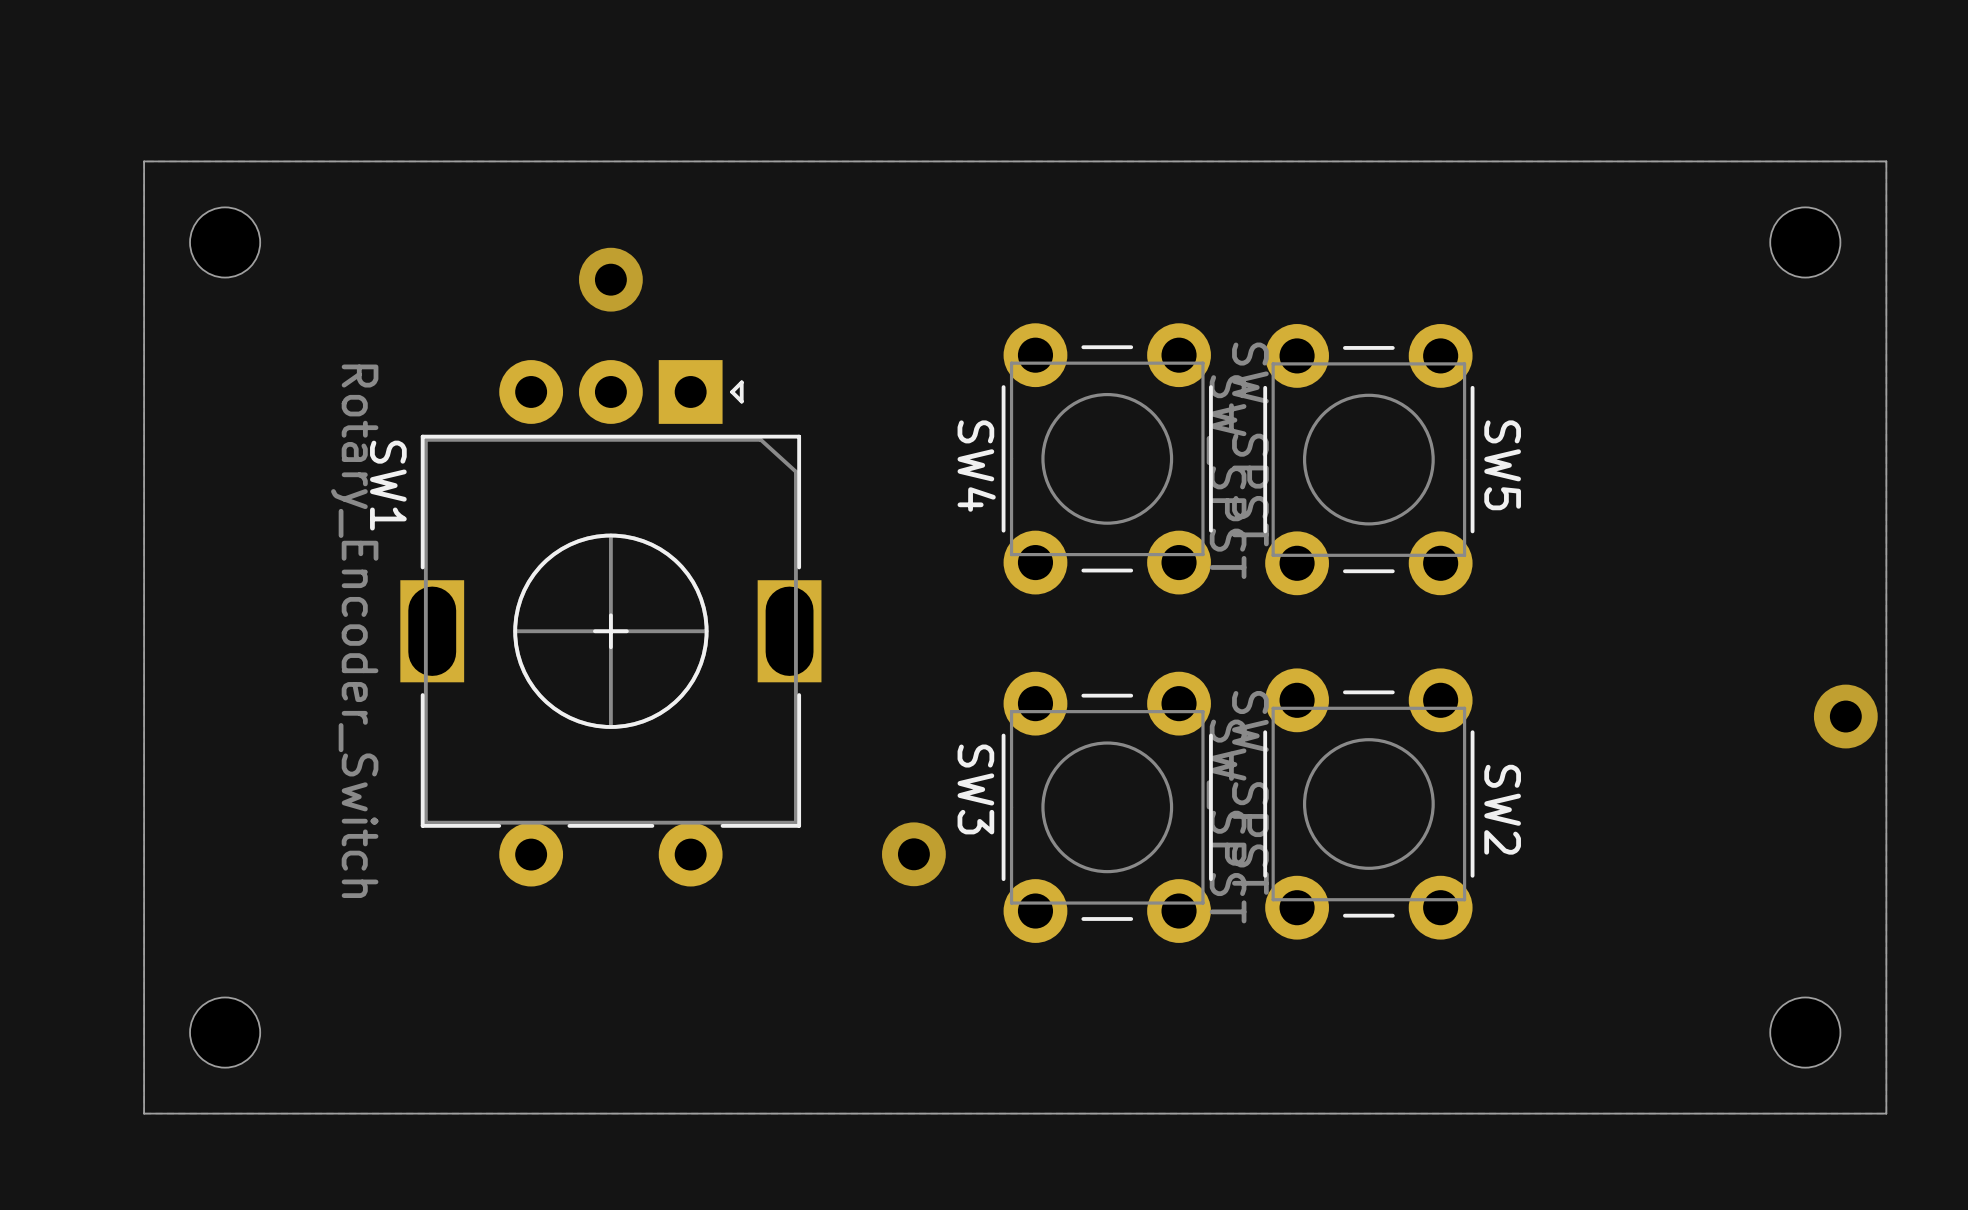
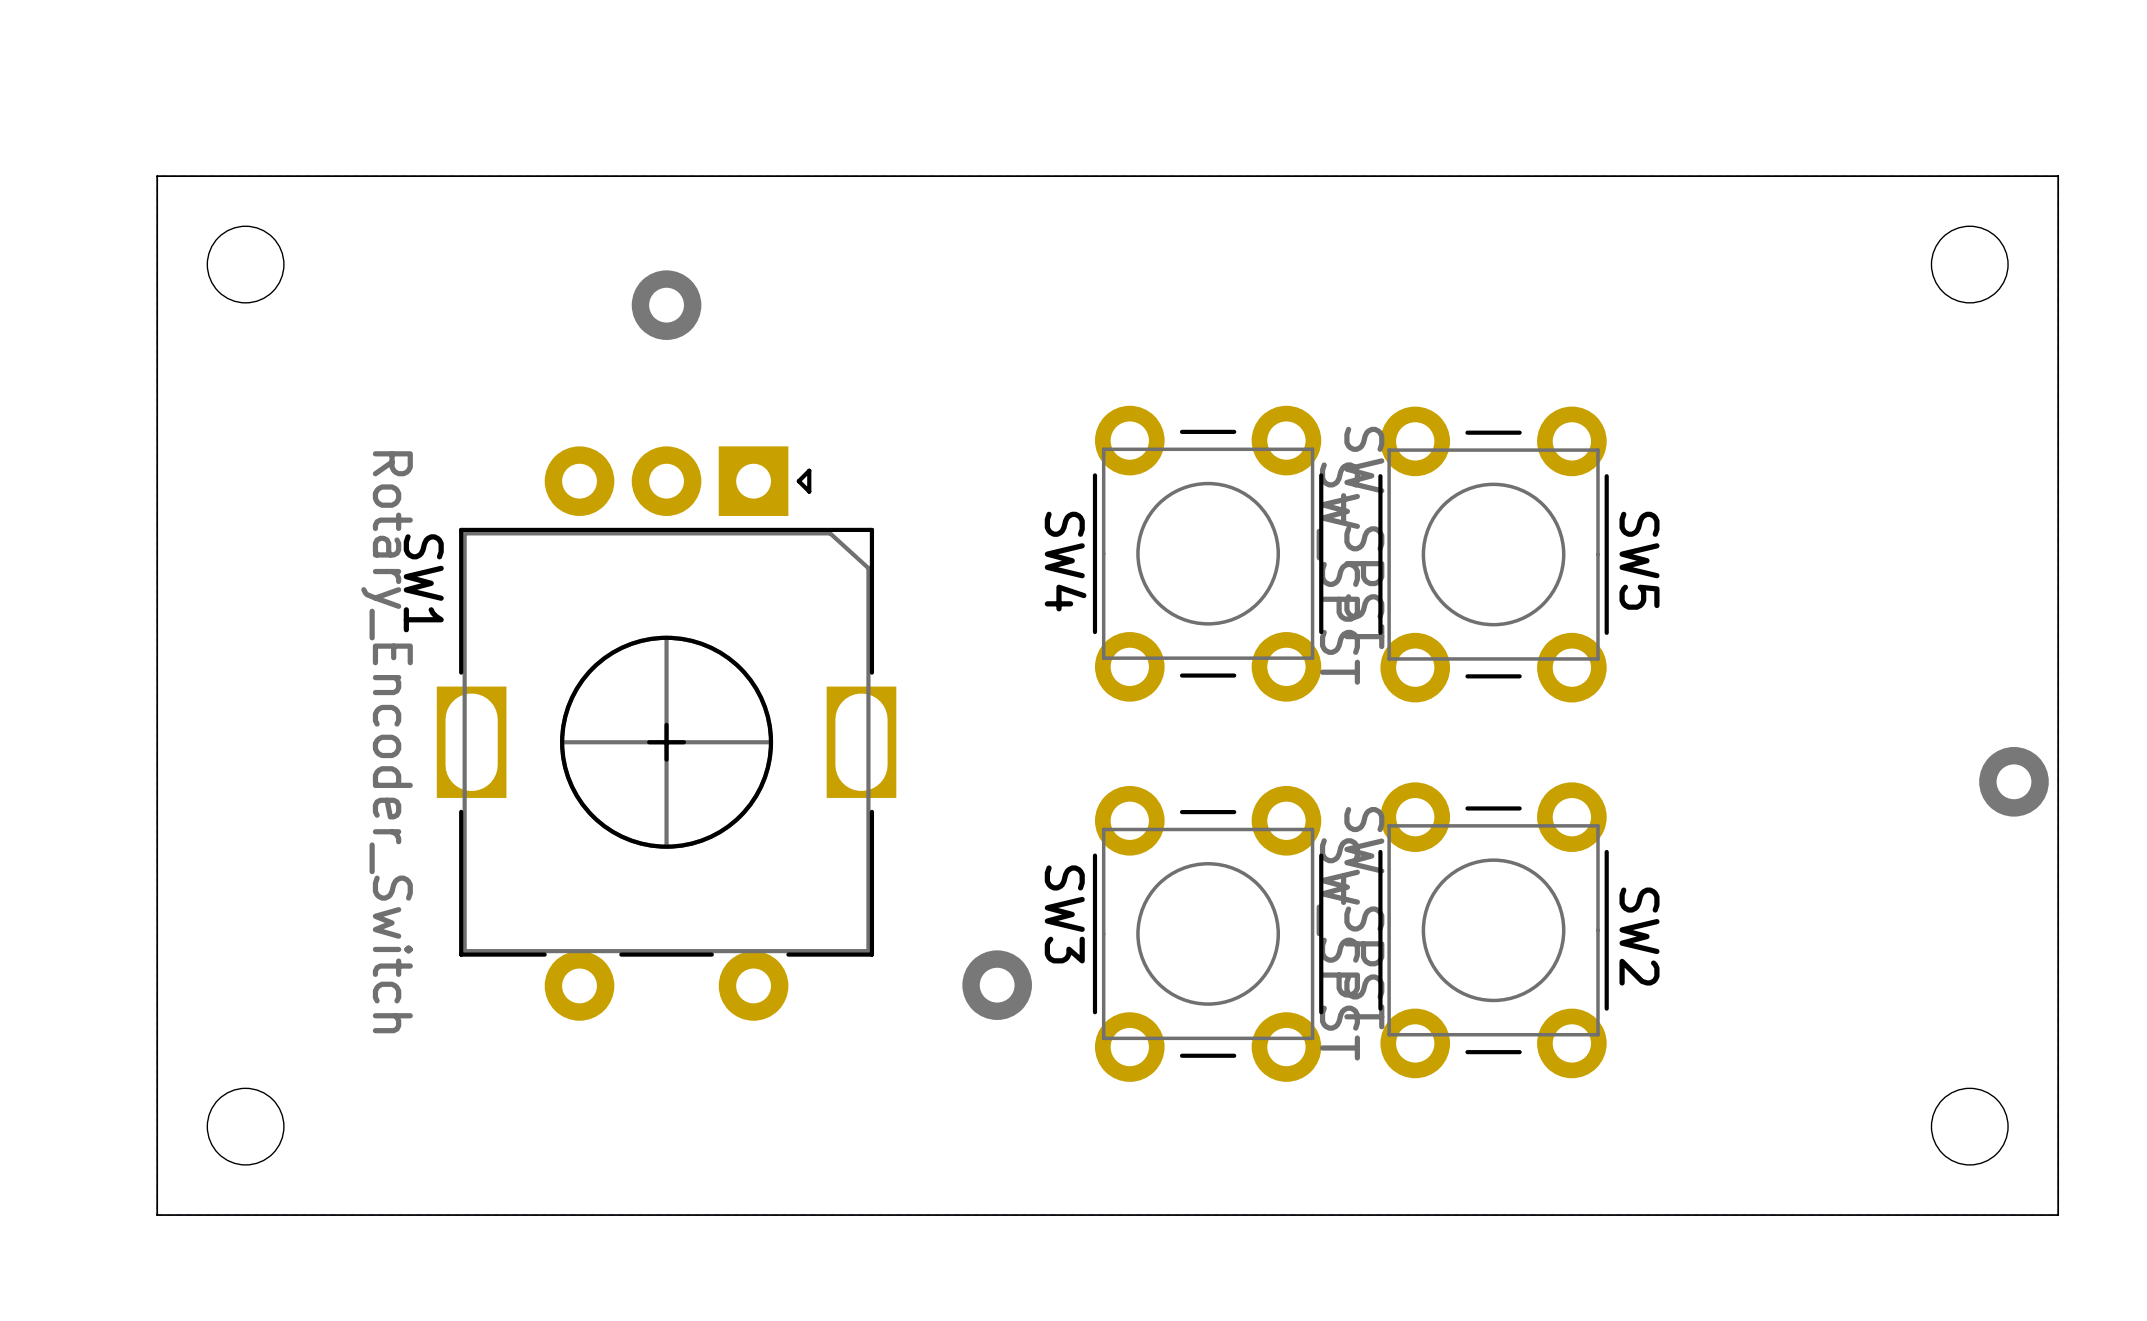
SW4 position: (1107, 458) -> (1208, 553)
SW5 position: (1368, 459) -> (1493, 554)
SW1 position: (610, 623) -> (666, 733)
SW2 position: (1368, 804) -> (1493, 930)
SW3 position: (1107, 807) -> (1208, 933)
via position: (913, 854) -> (997, 985)

